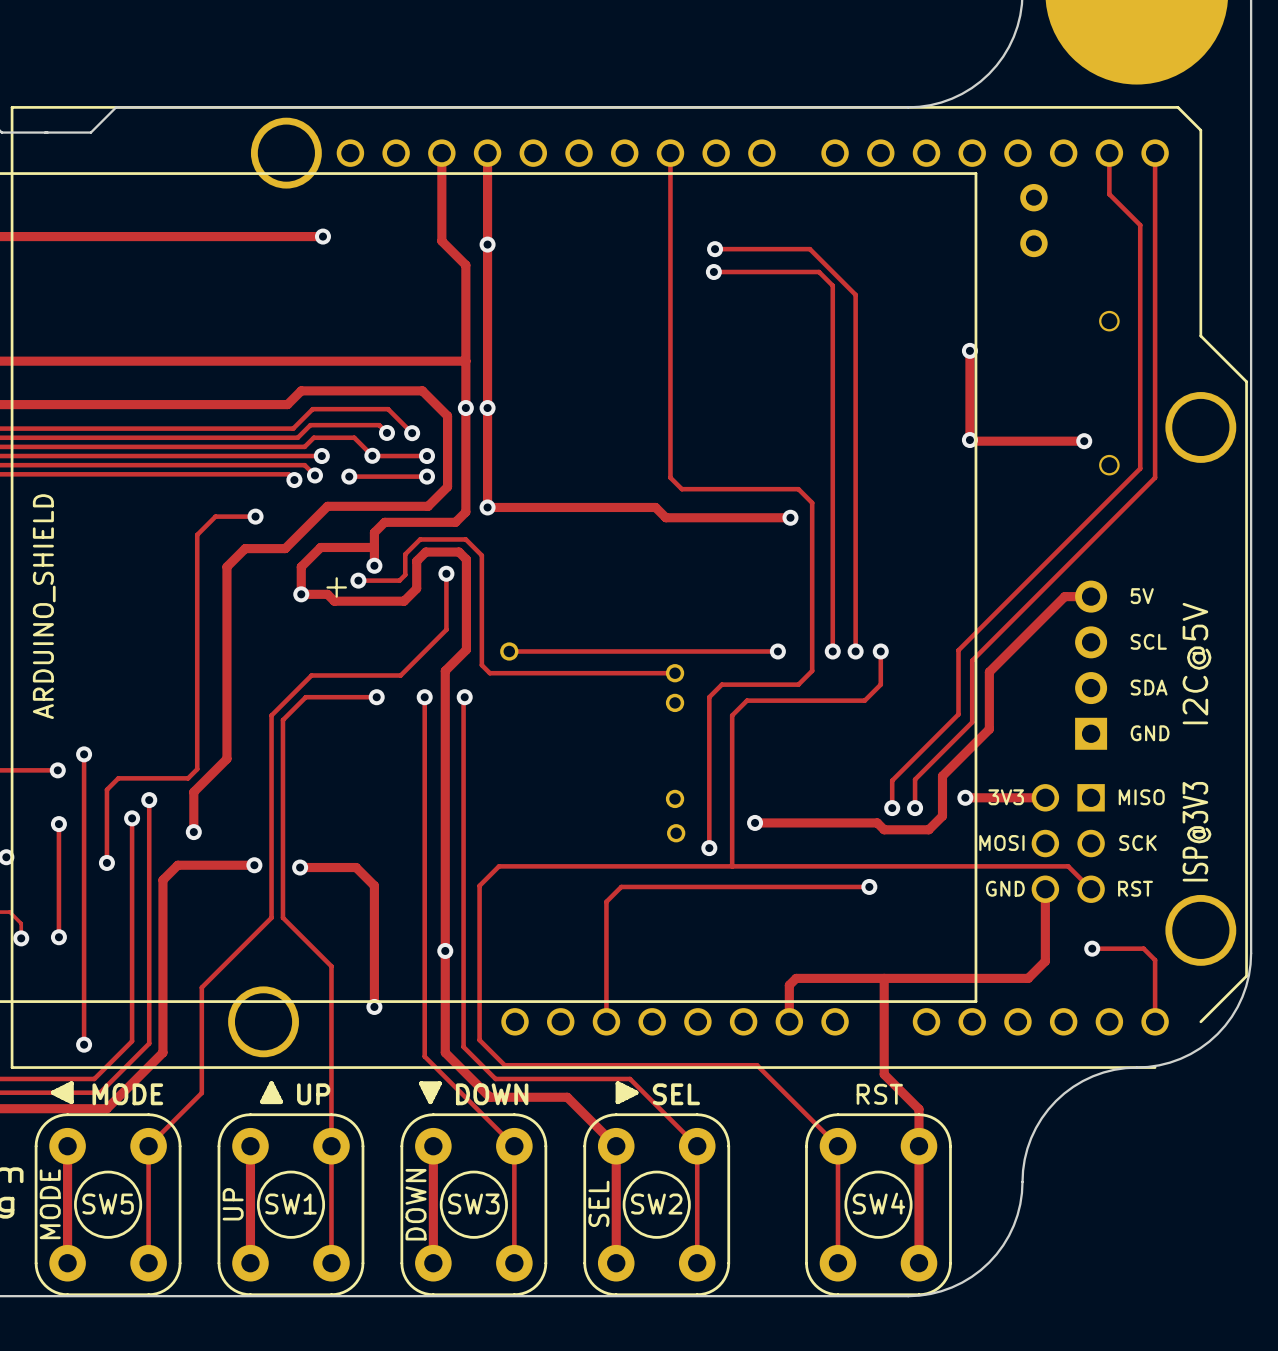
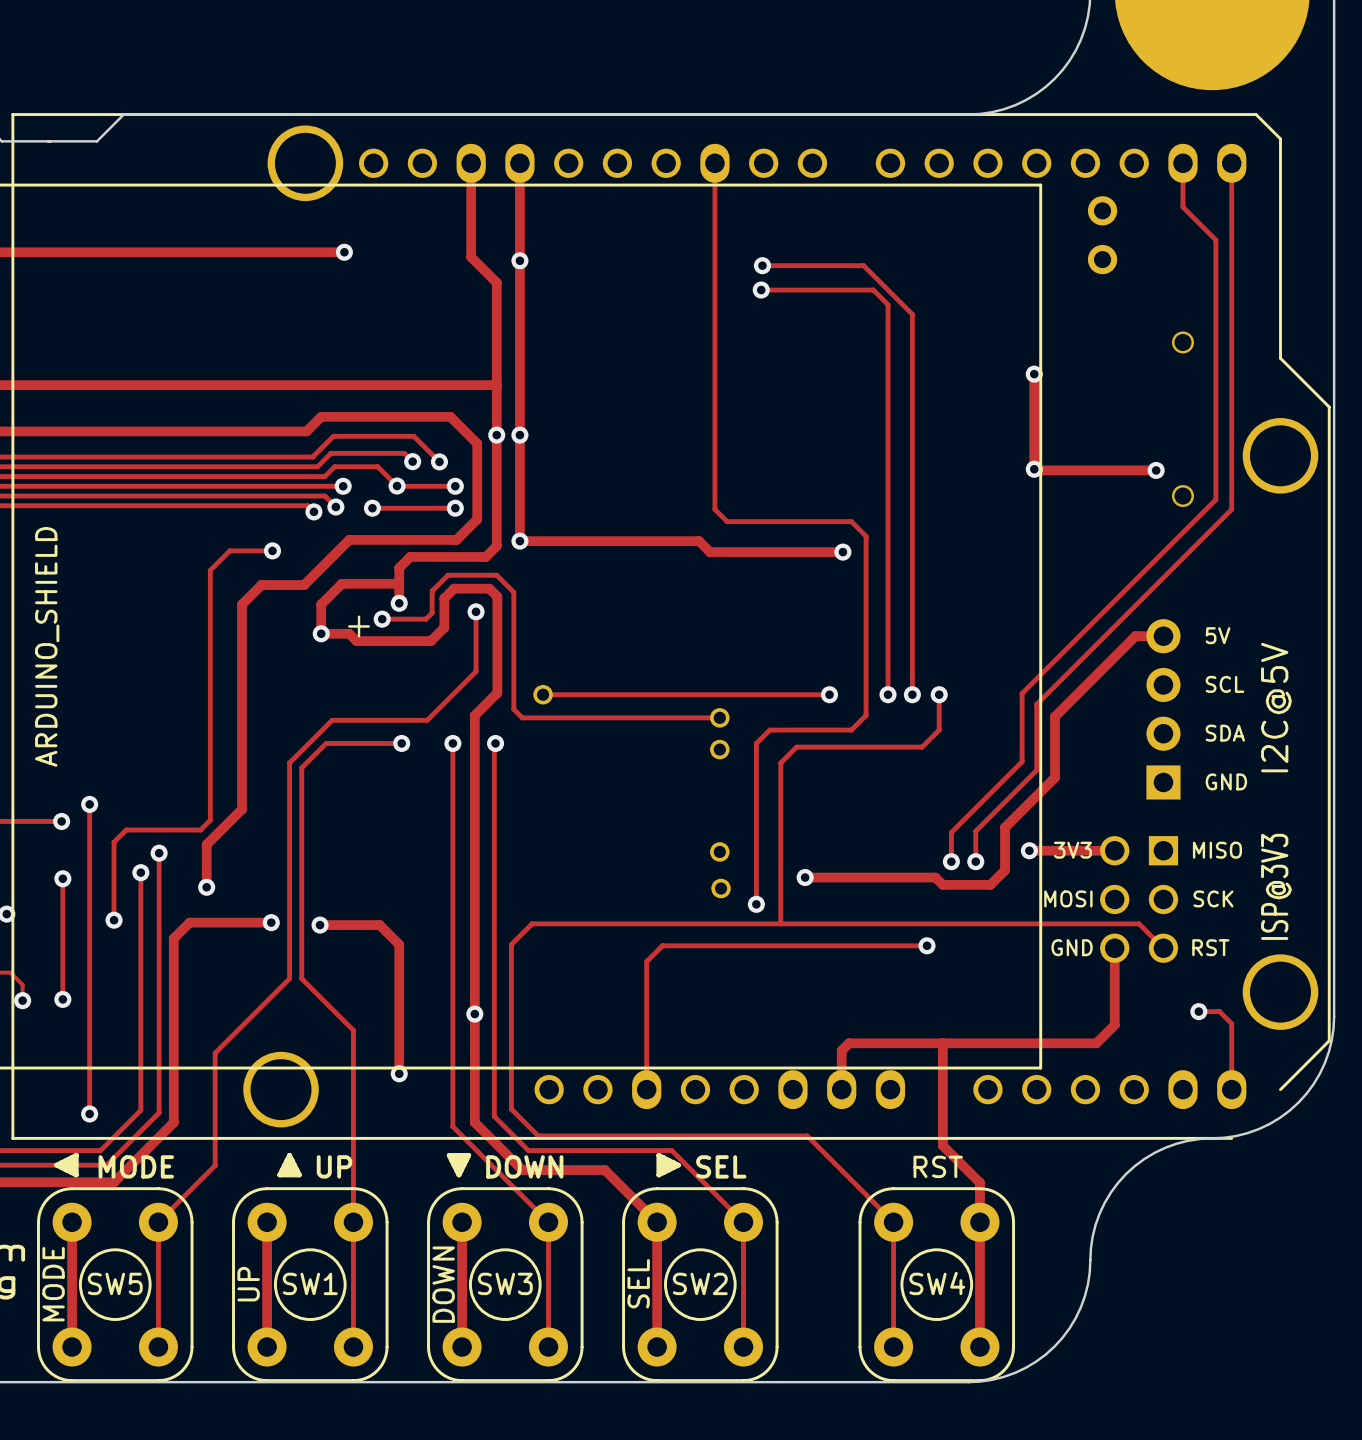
part footprint: [10, 106, 1248, 1069] -> [11, 113, 1331, 1140]
track: (1092, 948) (1124, 948) -> none
via position: (1092, 948) -> (1198, 1011)

